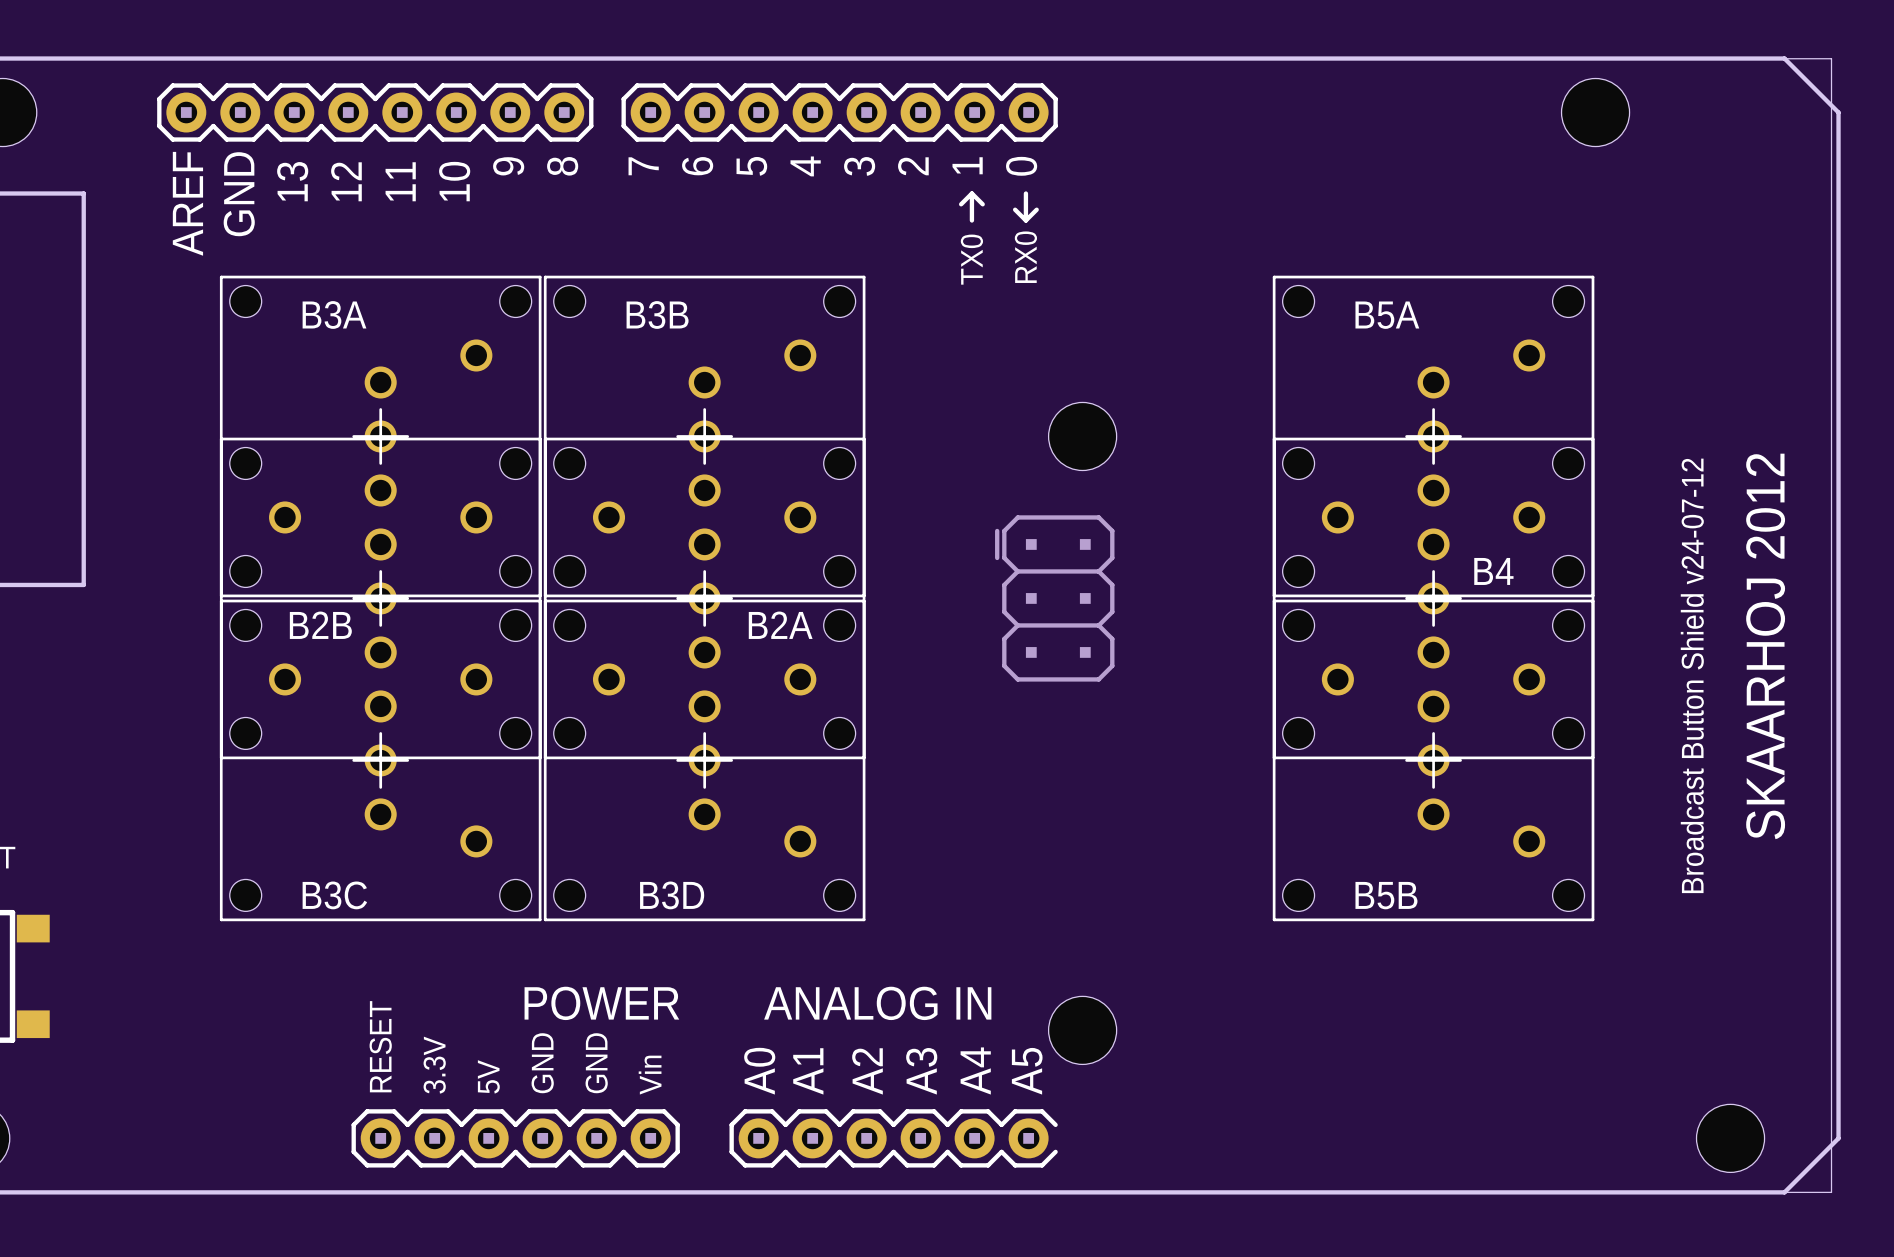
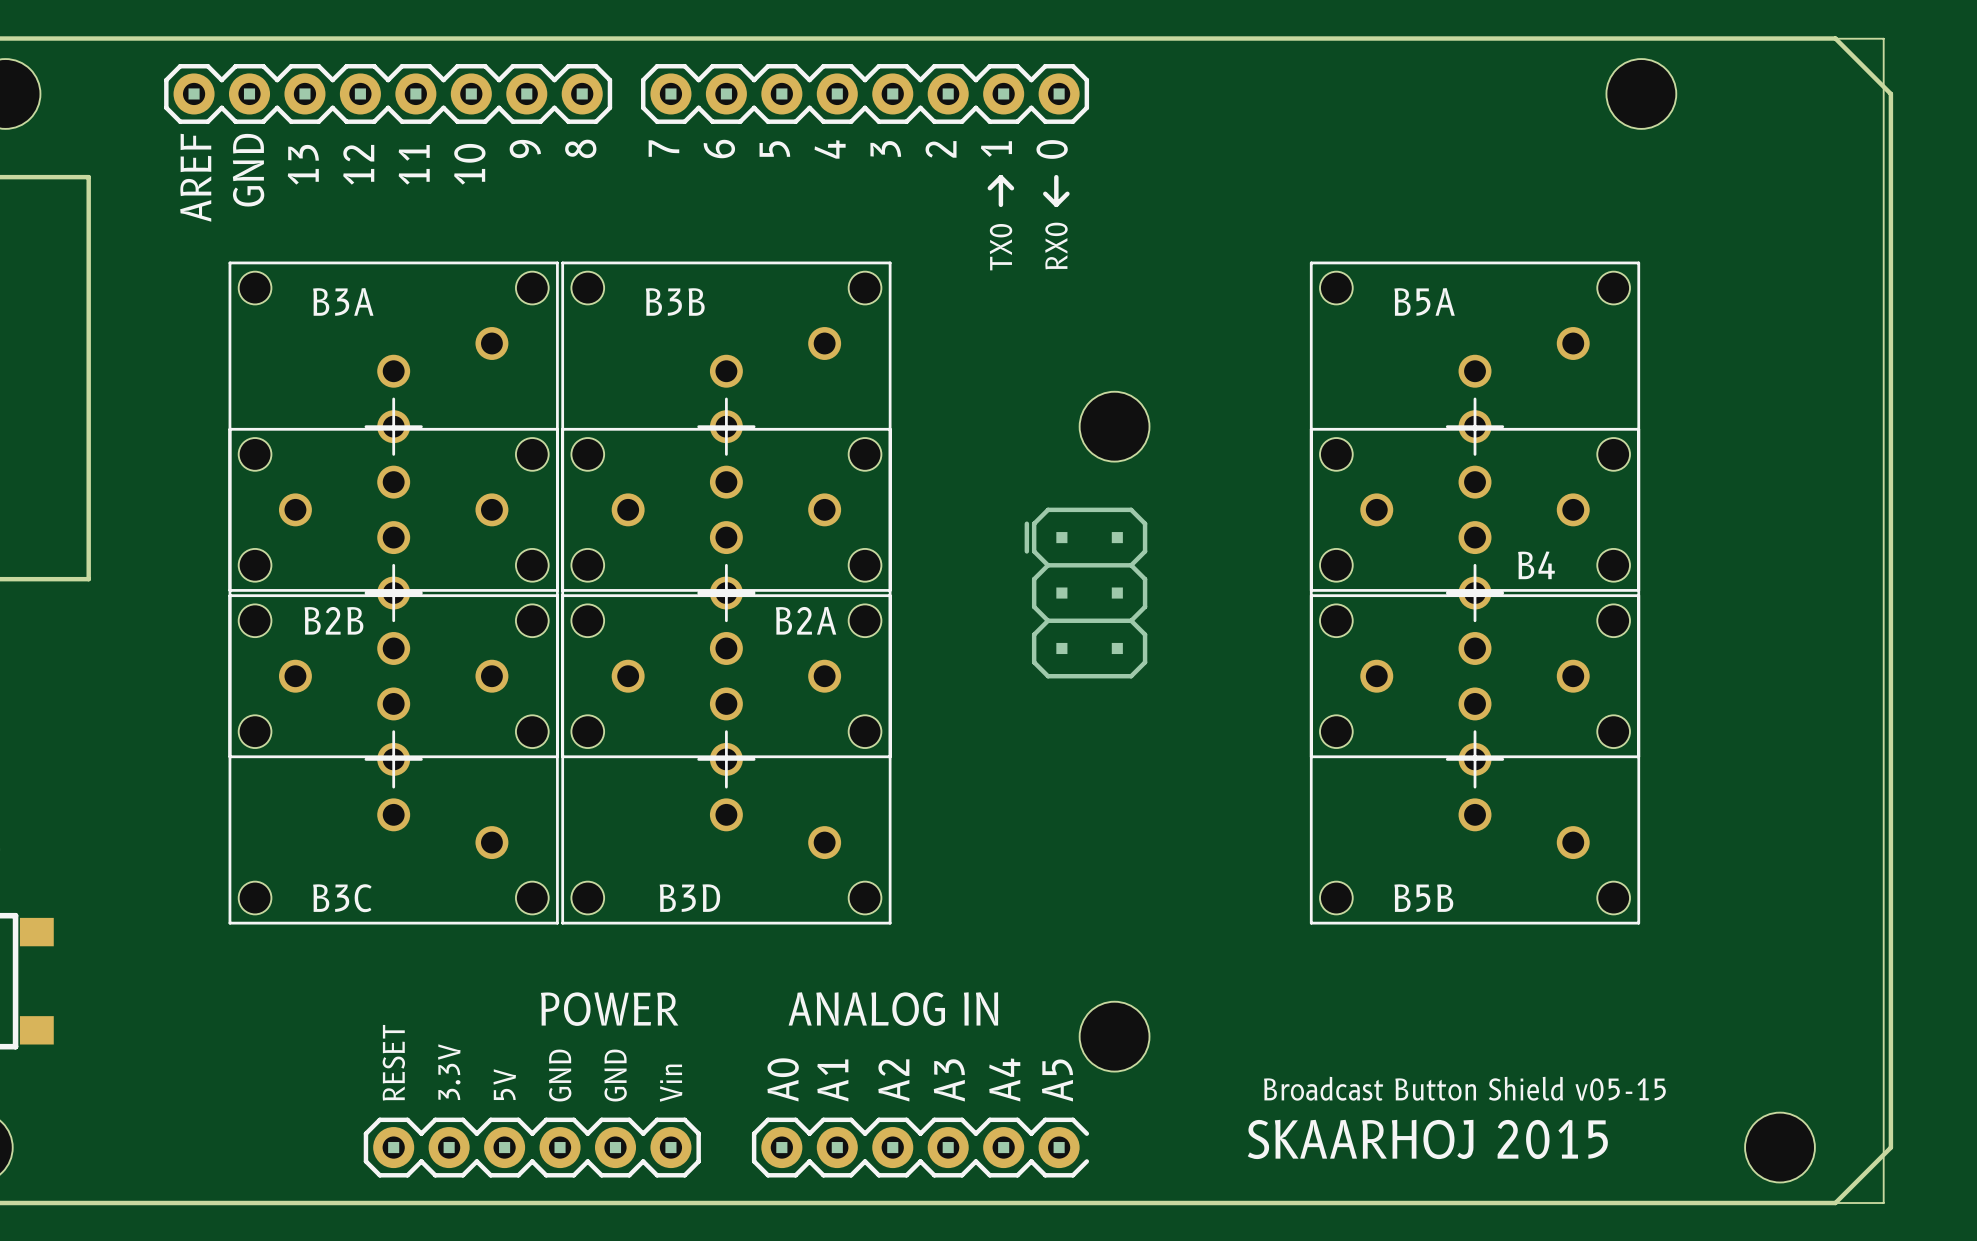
text: SKAARHOJ 2012 (1765, 646) -> none
text: Broadcast Button Shield v24-07-12 (1692, 675) -> none
text: none -> Broadcast Button Shield v05-15 (1464, 1088)
text: none -> SKAARHOJ 2015 (1427, 1139)

